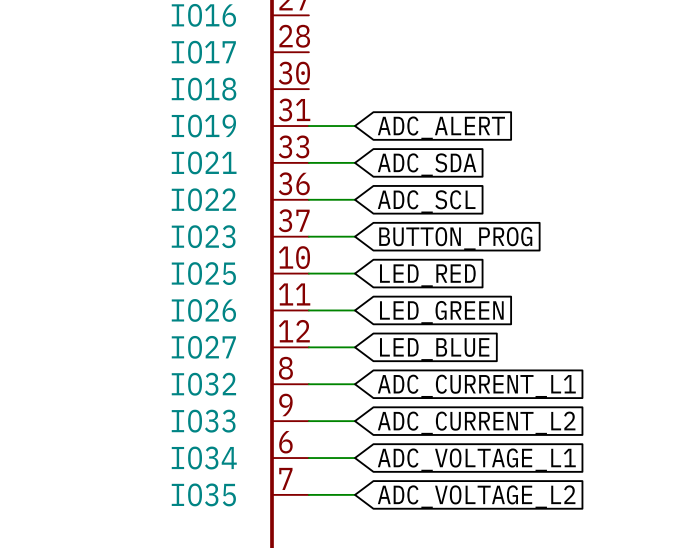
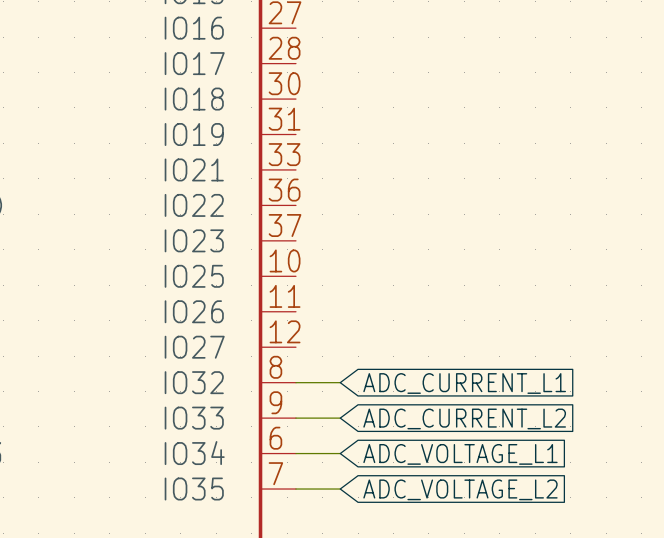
wire: (308, 126) (355, 126) -> none
global label: ADC_ALERT (441, 128) -> none
wire: (308, 162) (355, 162) -> none
global label: ADC_SDA (427, 164) -> none
wire: (308, 199) (355, 199) -> none
global label: ADC_SCL (426, 201) -> none
wire: (308, 236) (355, 236) -> none
global label: BUTTON_PROG (455, 238) -> none
wire: (308, 273) (355, 273) -> none
global label: LED_RED (427, 275) -> none
wire: (308, 310) (355, 310) -> none
global label: LED_GREEN (441, 312) -> none
wire: (308, 347) (355, 347) -> none
global label: LED_BLUE (434, 349) -> none

